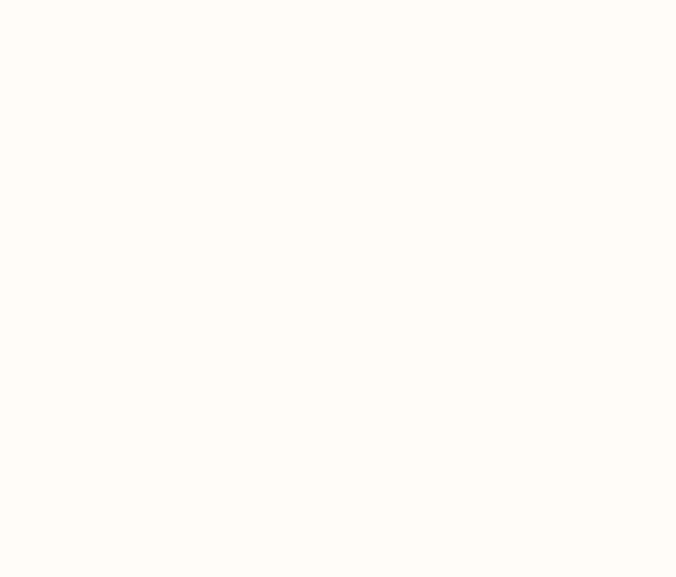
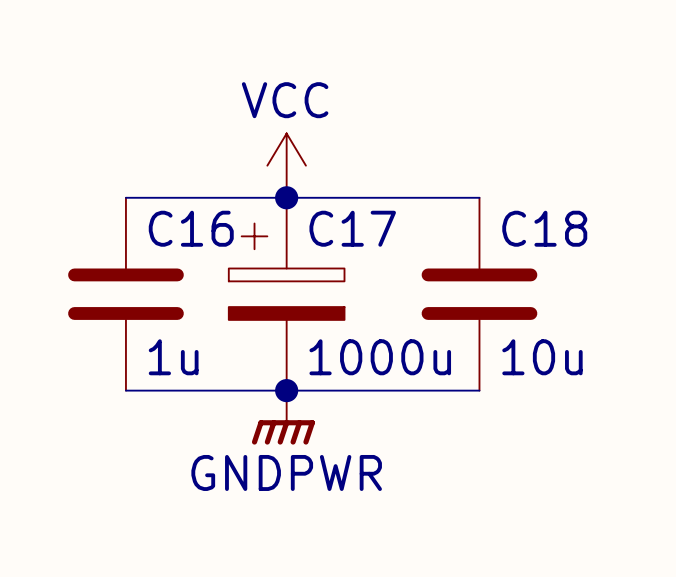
power symbol: none -> VCC (286, 165)
wire: none -> (125, 197) (479, 197)
junction: none -> (286, 197)
C16: none -> 1u (125, 294)
C17: none -> 1000u (286, 294)
C18: none -> 10u (479, 294)
wire: none -> (125, 390) (479, 390)
junction: none -> (286, 390)
power symbol: none -> GNDPWR (283, 417)

